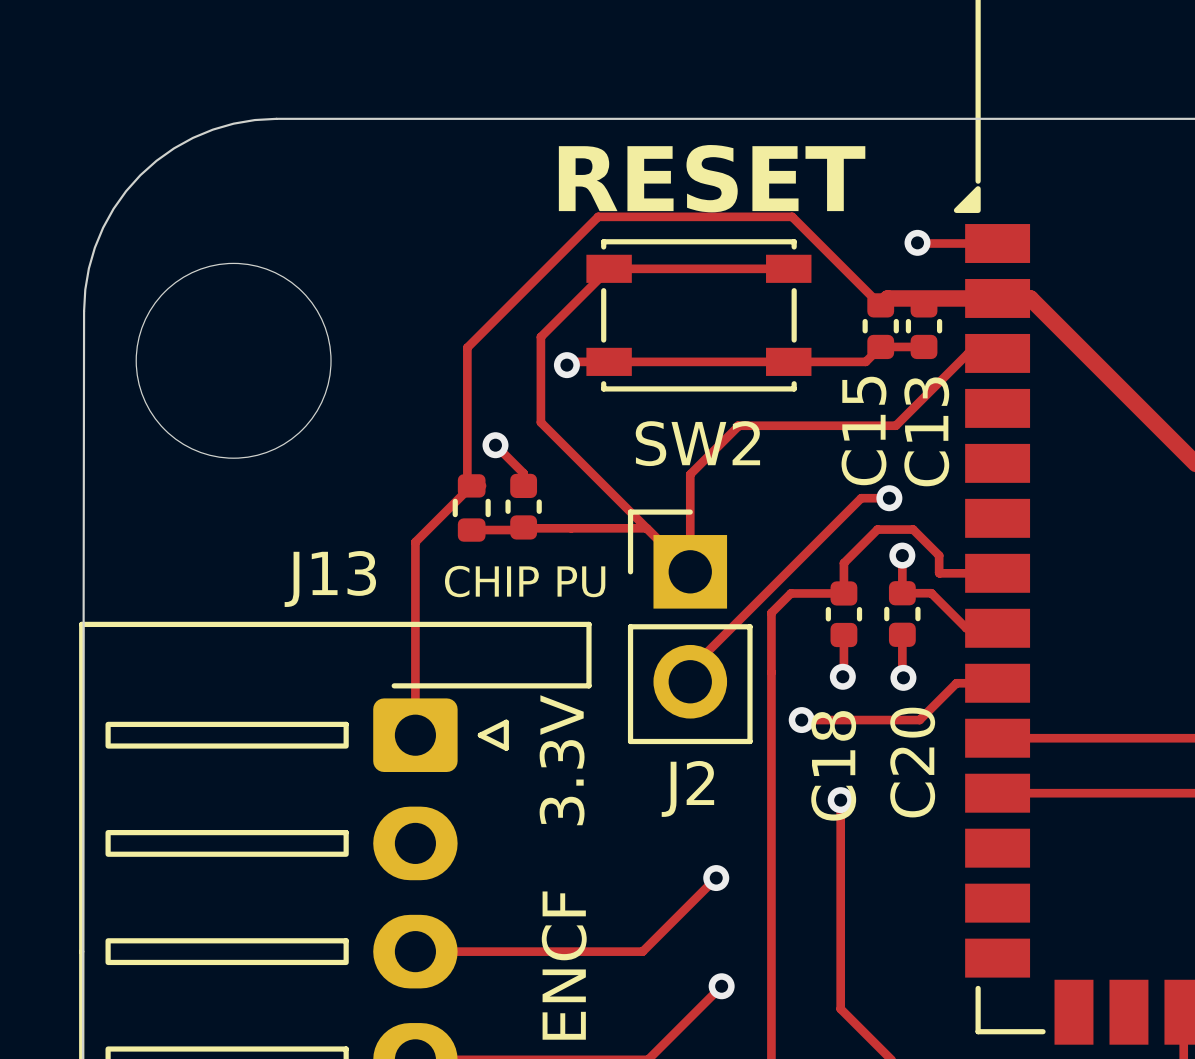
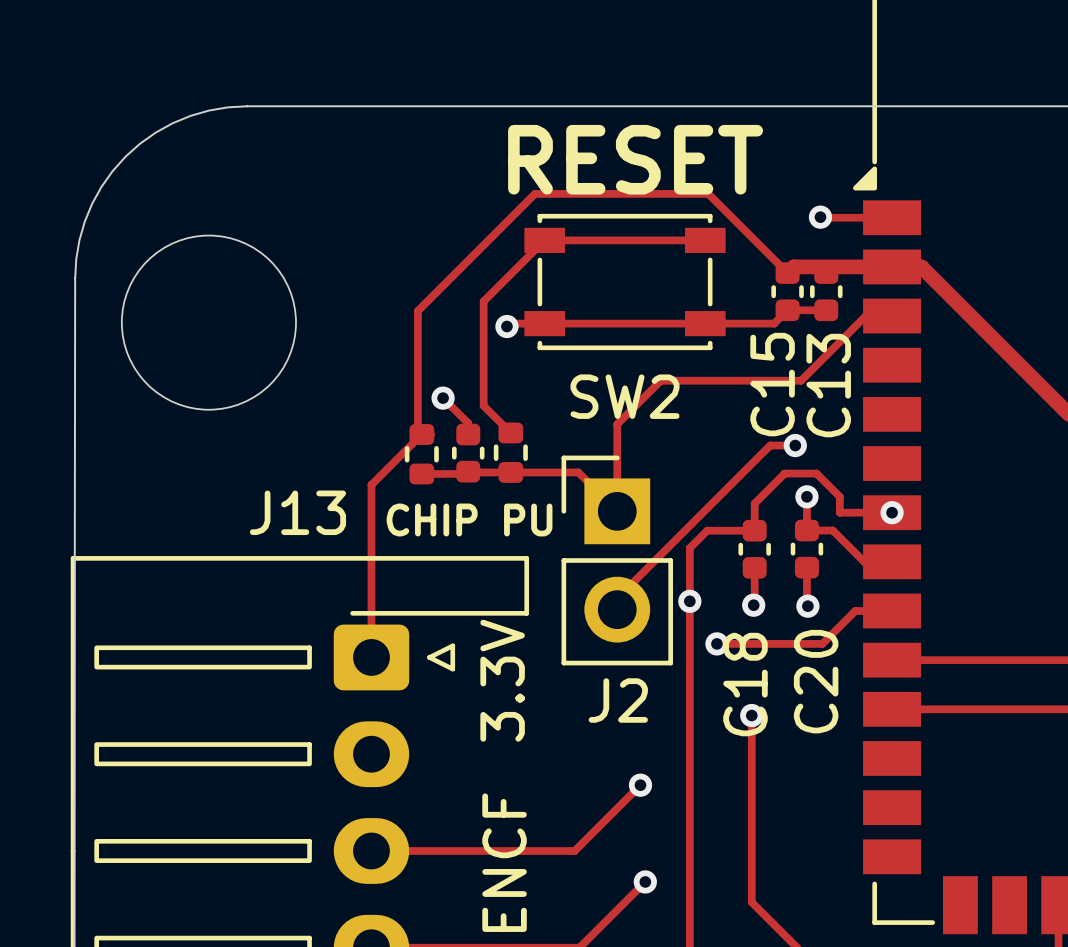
track: (540, 422) (646, 528) -> (483, 377) (483, 405) (510, 432)
part: none -> (510, 452)
via: none -> (892, 512)
via: none -> (689, 601)

